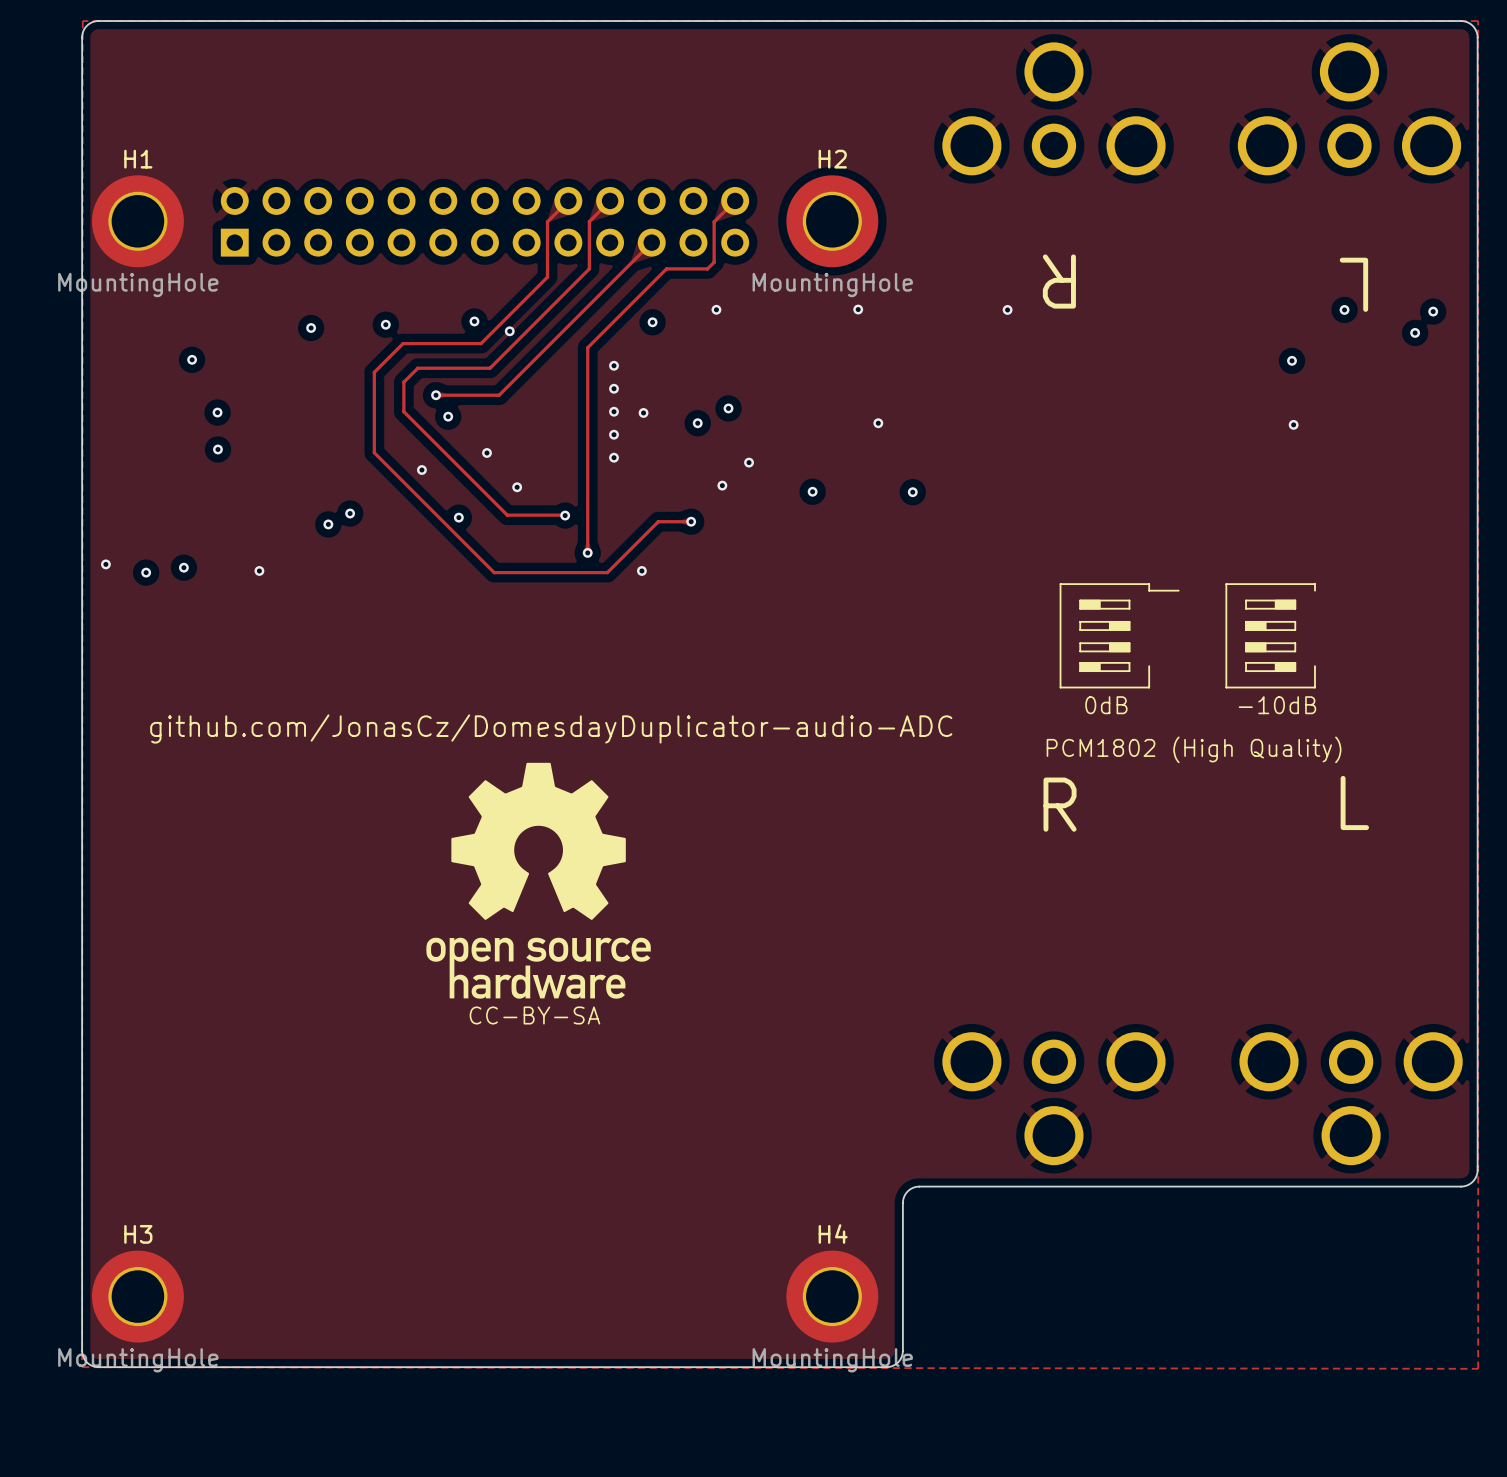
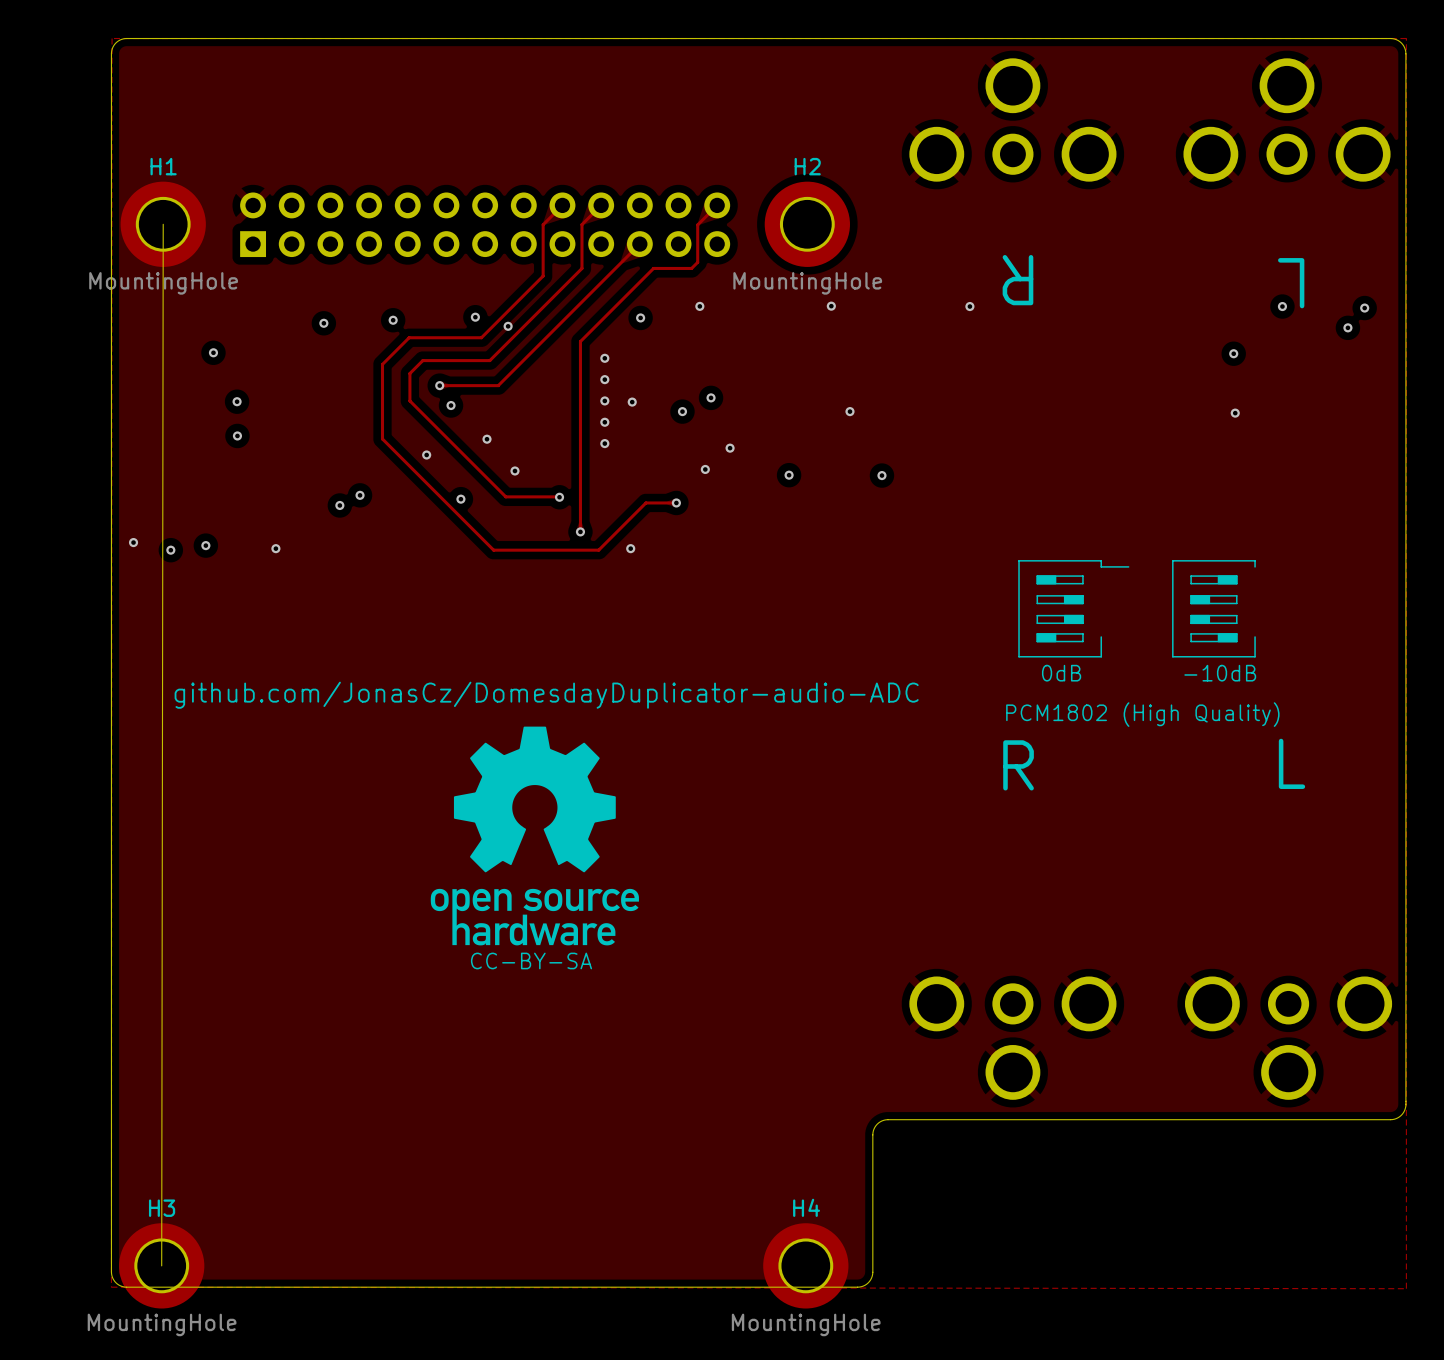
board edge: none -> (163, 224) (161, 1265)
H3 position: (137, 1296) -> (161, 1265)
H4 position: (832, 1296) -> (805, 1265)

